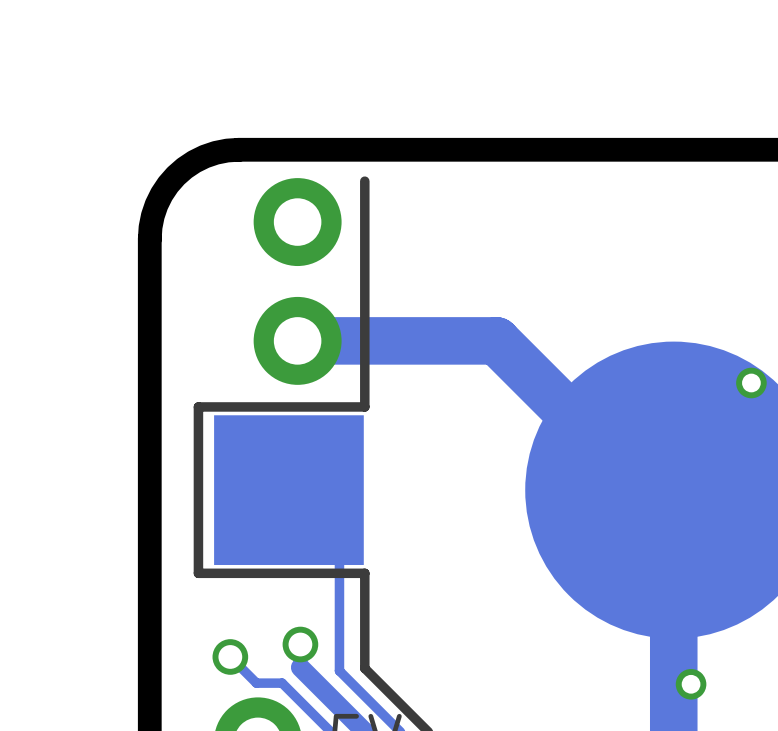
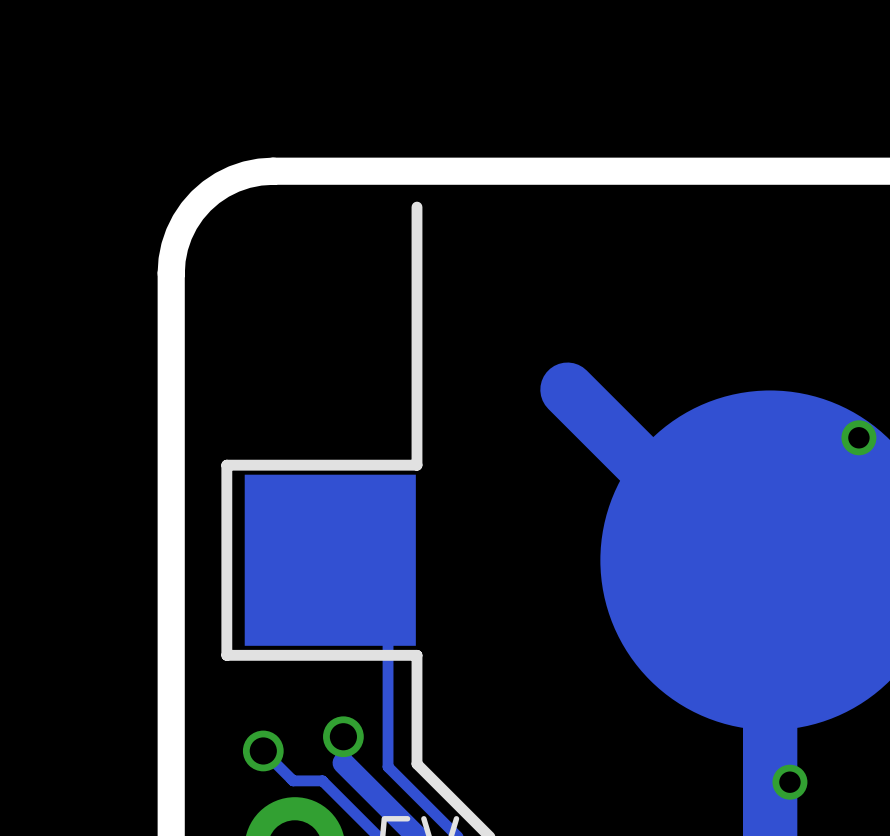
part: (297, 281) -> none
track: (496, 340) (297, 340) -> none

